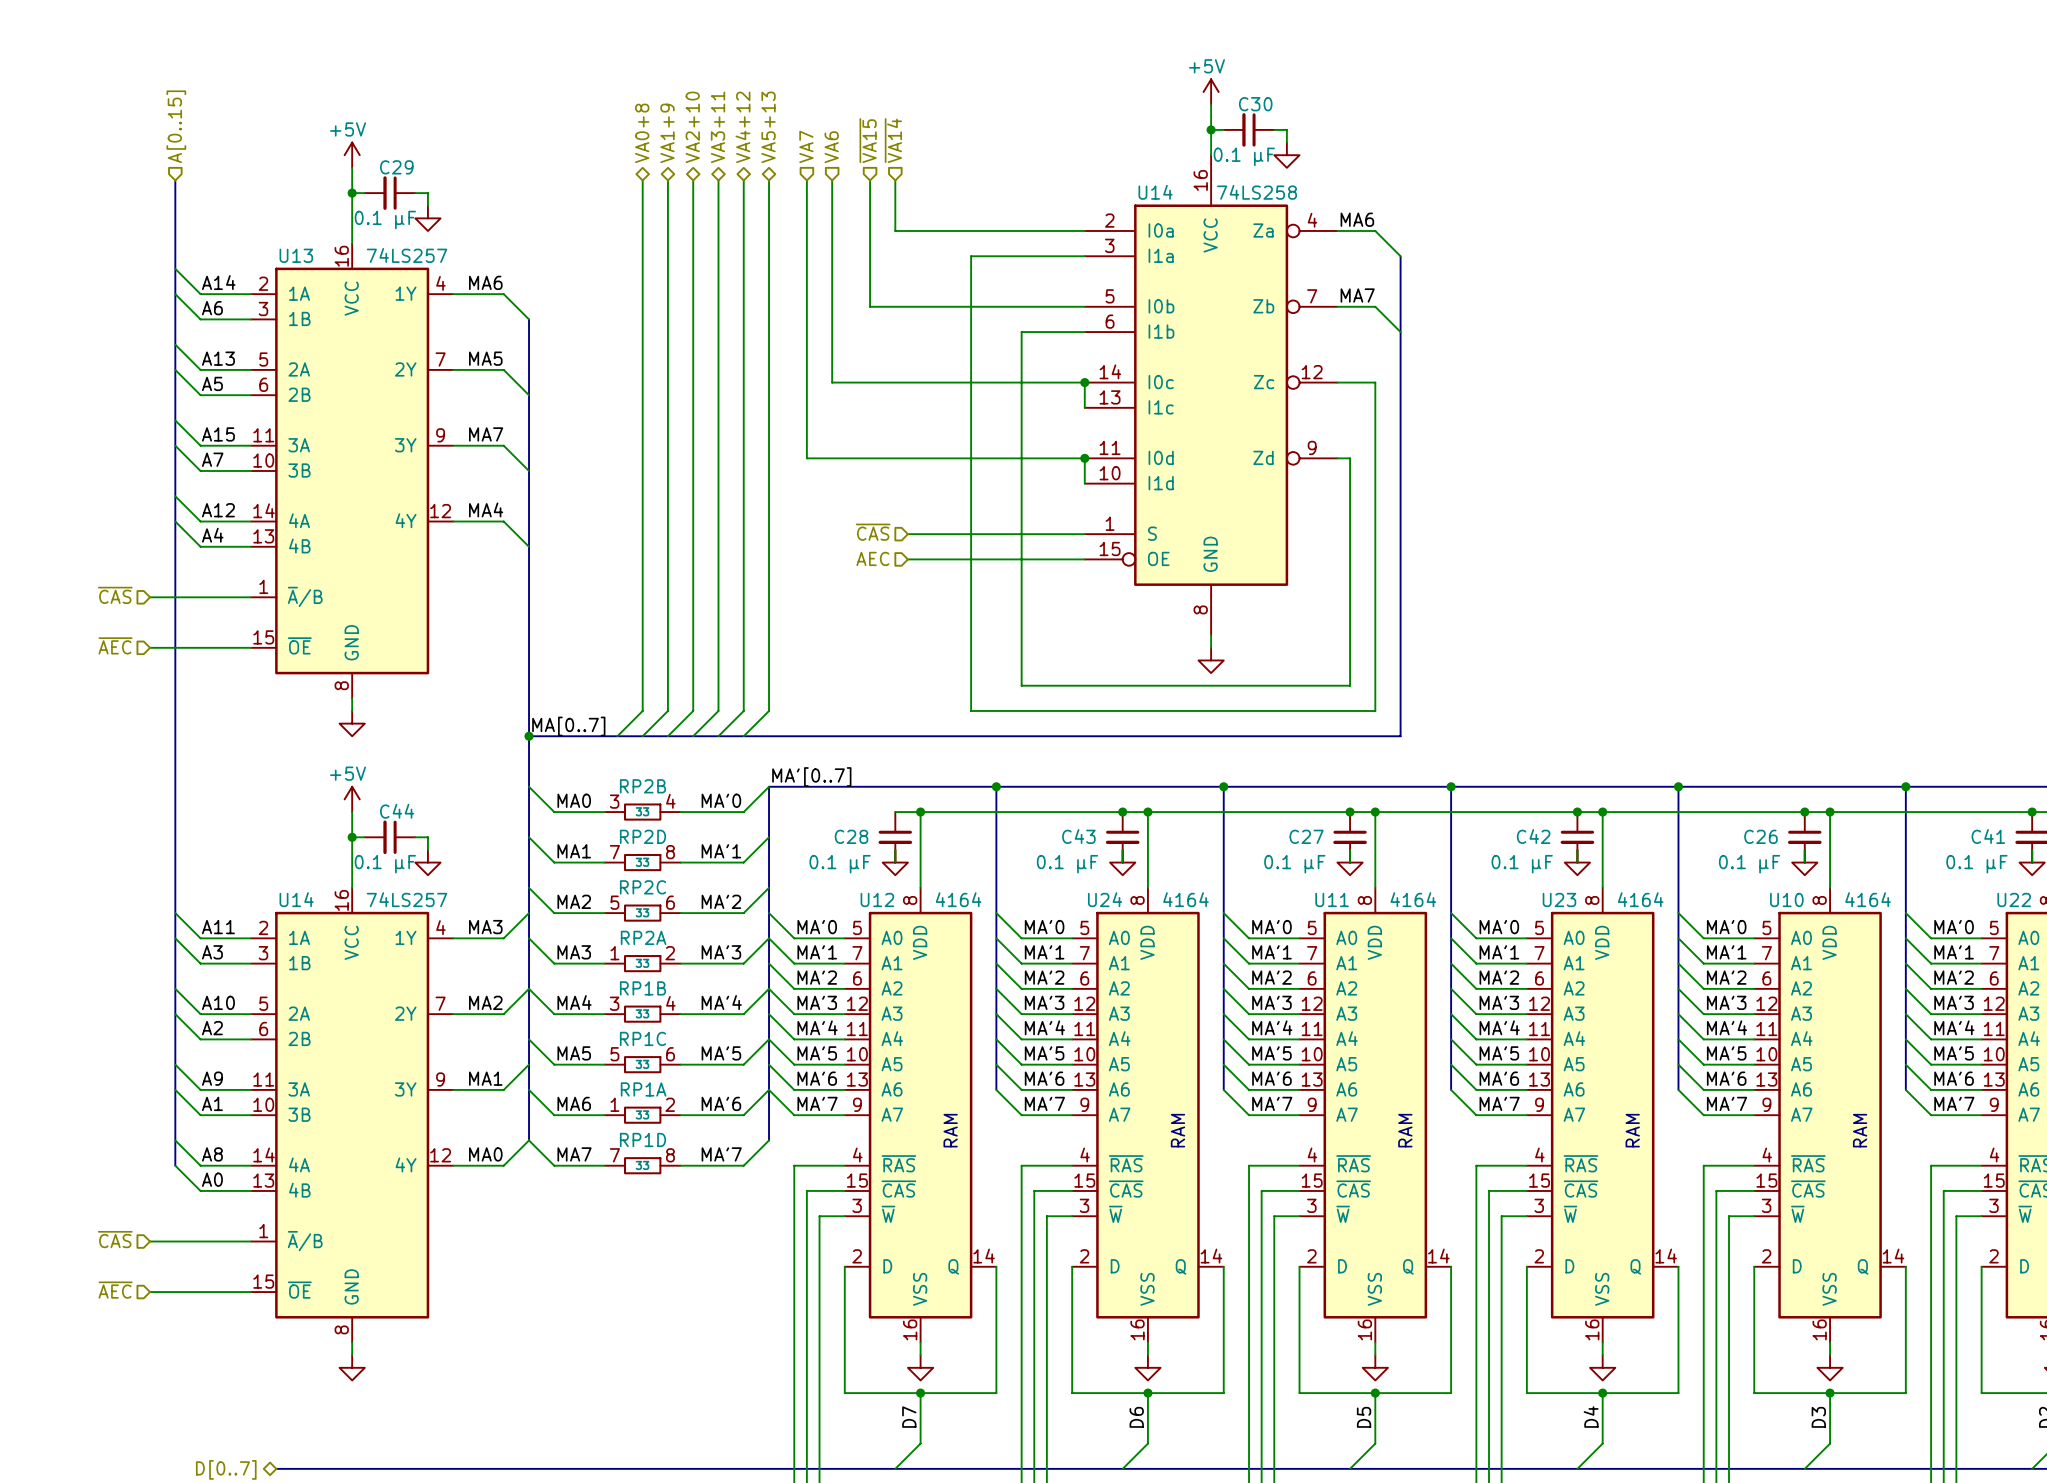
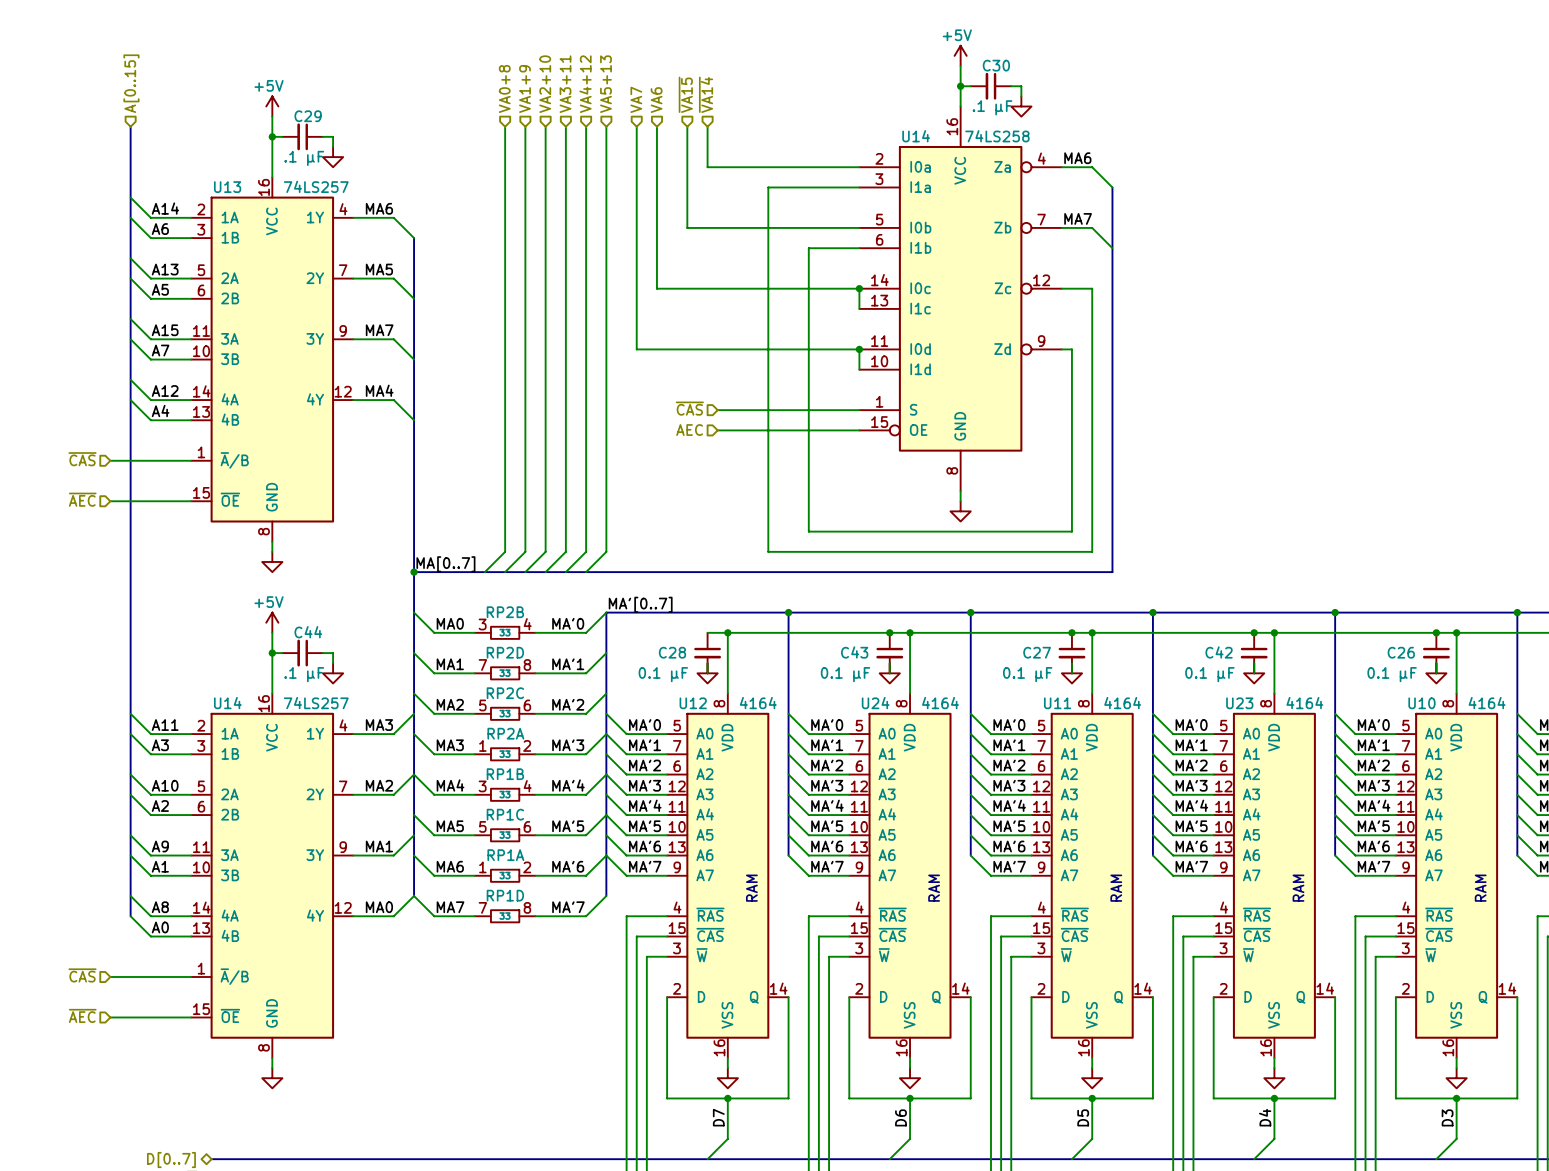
hierarchical label shape: bidirectional (692, 127) -> input (545, 84)
hierarchical label shape: bidirectional (718, 127) -> input (565, 84)
hierarchical label shape: bidirectional (742, 127) -> input (585, 84)
hierarchical label shape: bidirectional (768, 127) -> input (605, 84)
hierarchical label shape: bidirectional (642, 133) -> input (504, 88)
hierarchical label shape: bidirectional (667, 133) -> input (525, 88)
C30 value: 0.1 μF (1244, 156) -> .1 μF (992, 107)
C29 value: 0.1 μF (385, 219) -> .1 μF (304, 158)
C44 value: 0.1 μF (385, 864) -> .1 μF (304, 674)

